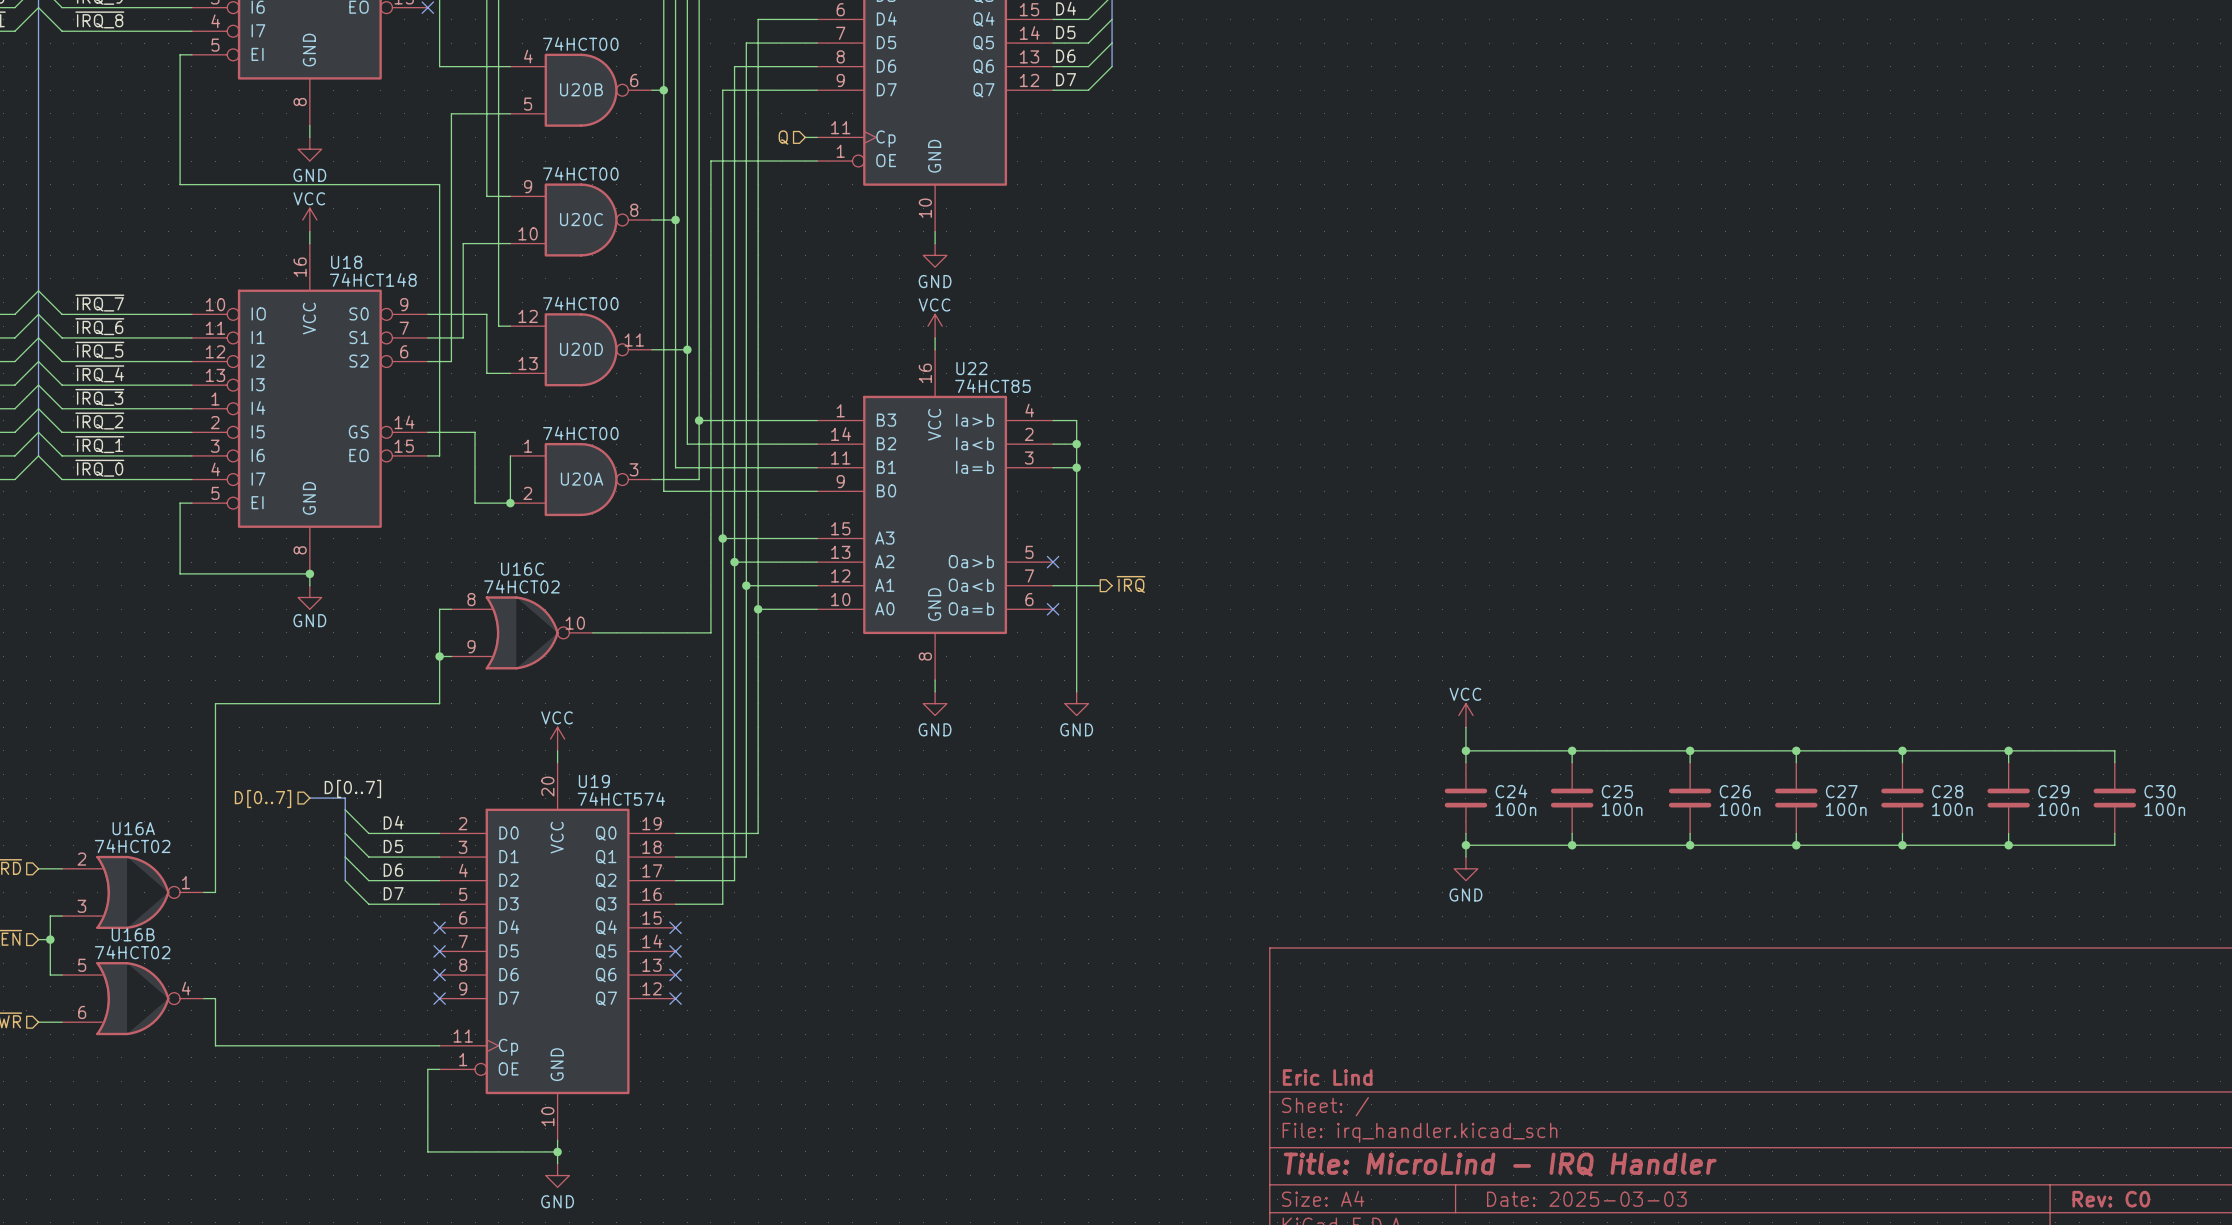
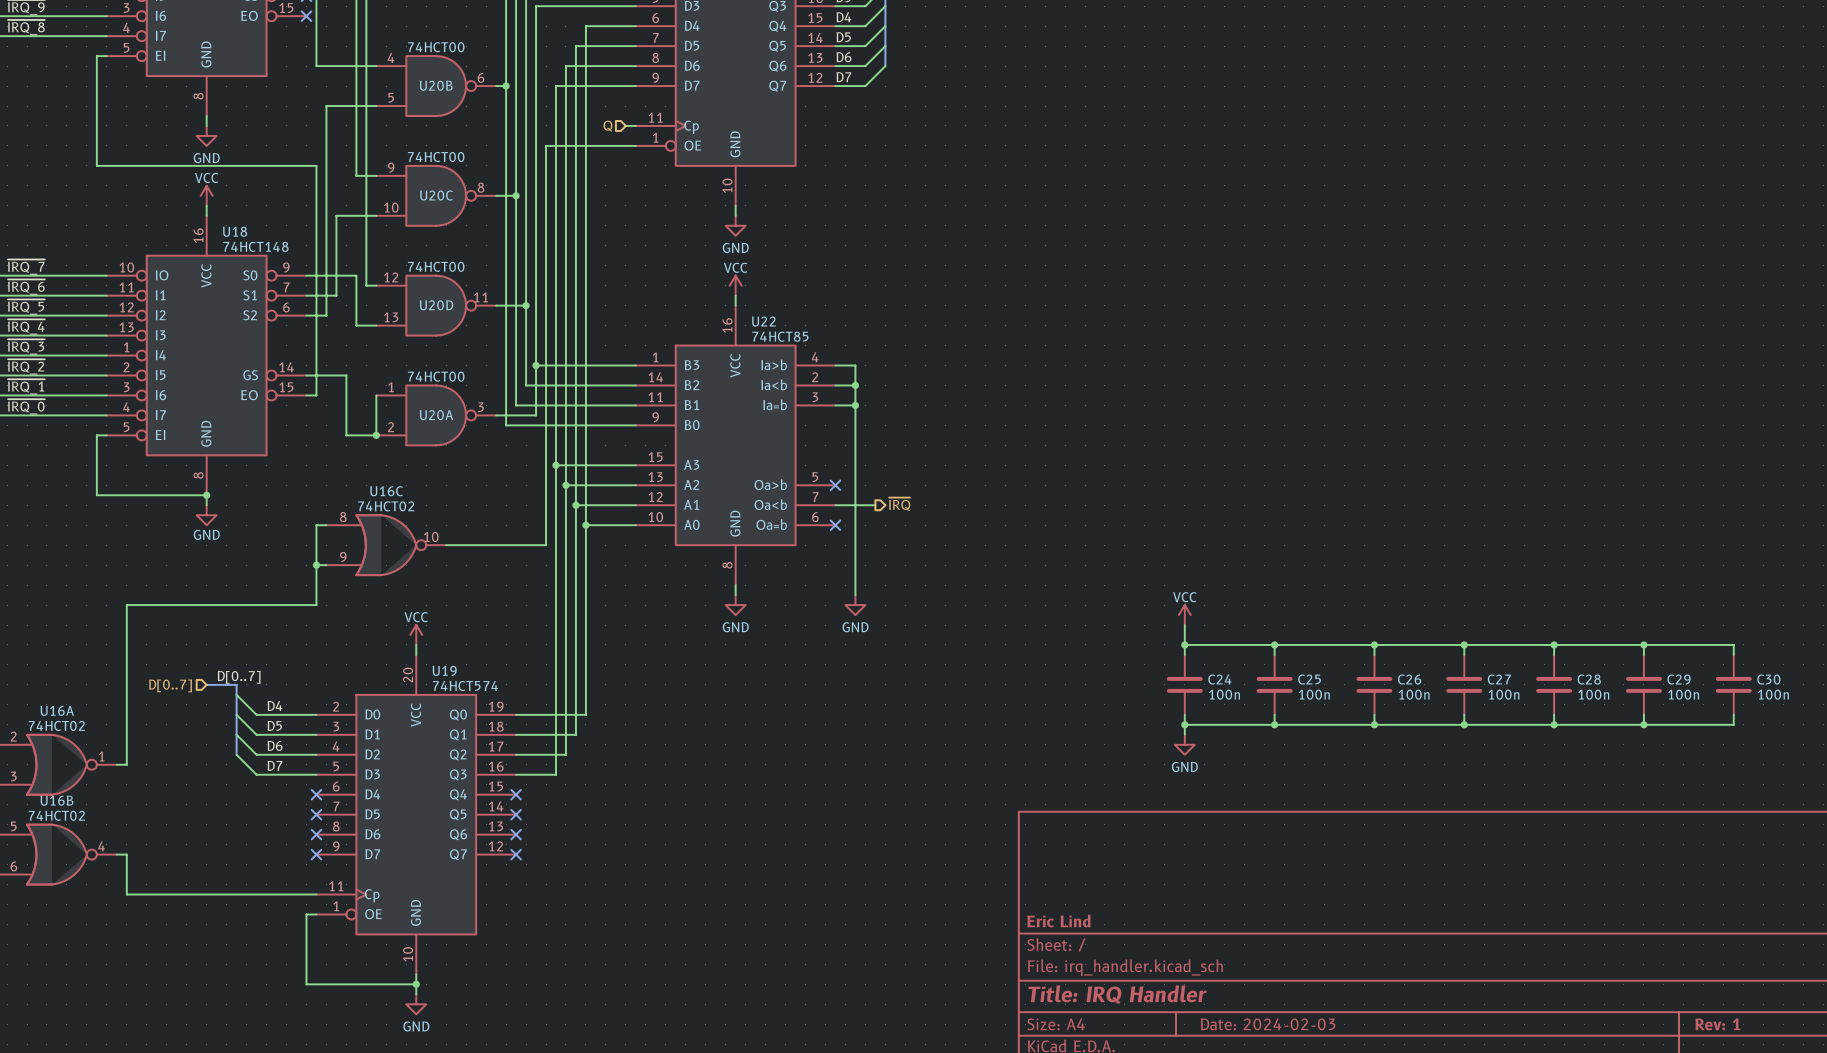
title block: Title: MicroLind - IRQ Handler (1500, 1164) -> Title: IRQ Handler (1117, 994)
title block: Date: 2025-03-03 (1586, 1199) -> Date: 2024-02-03 (1268, 1024)
title block: Rev: C0 (2111, 1199) -> Rev: 1 (1717, 1024)

